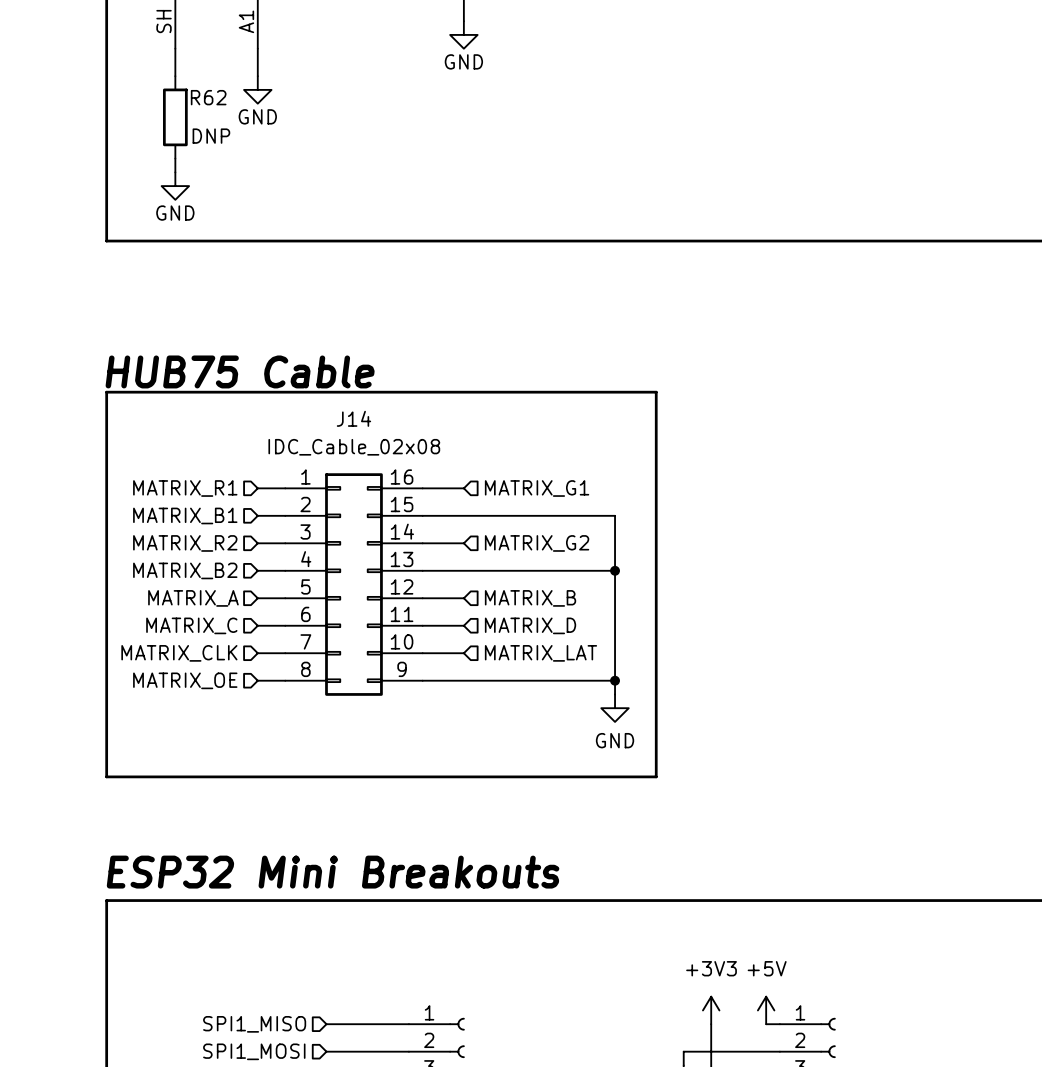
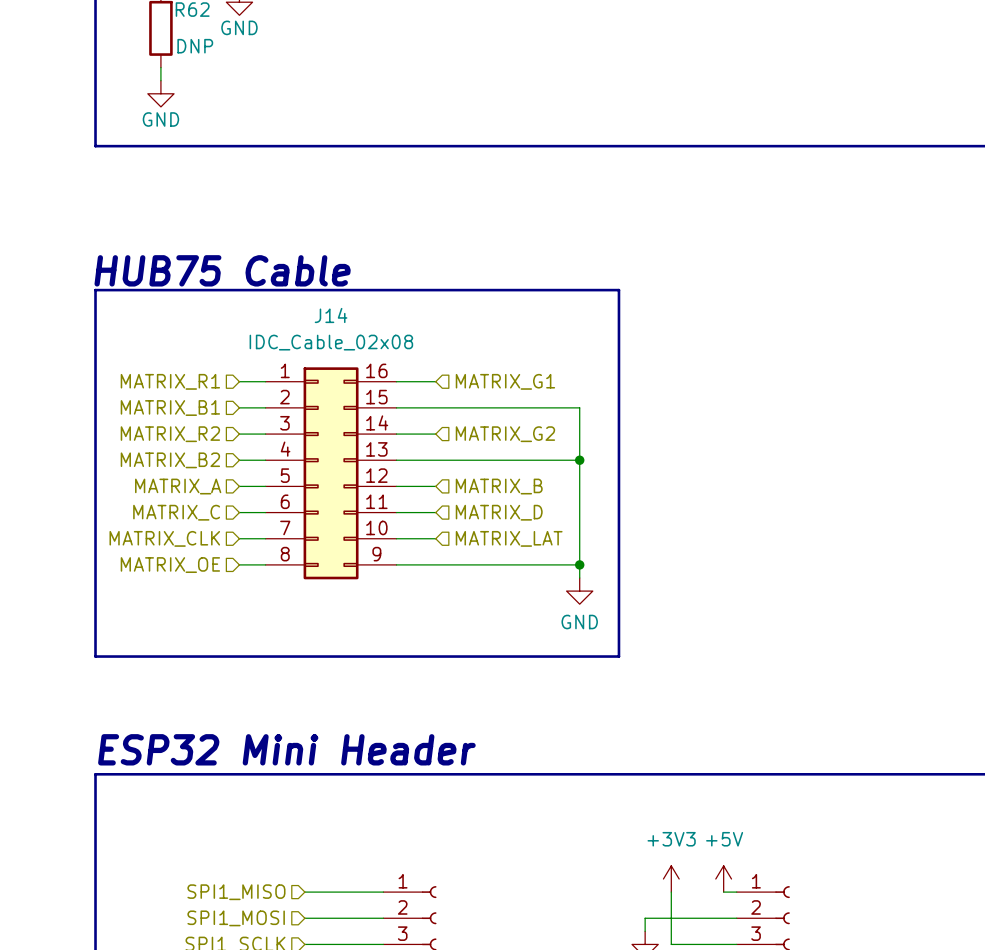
text: ESP32 Mini Breakouts (333, 872) -> ESP32 Mini Header (286, 749)

